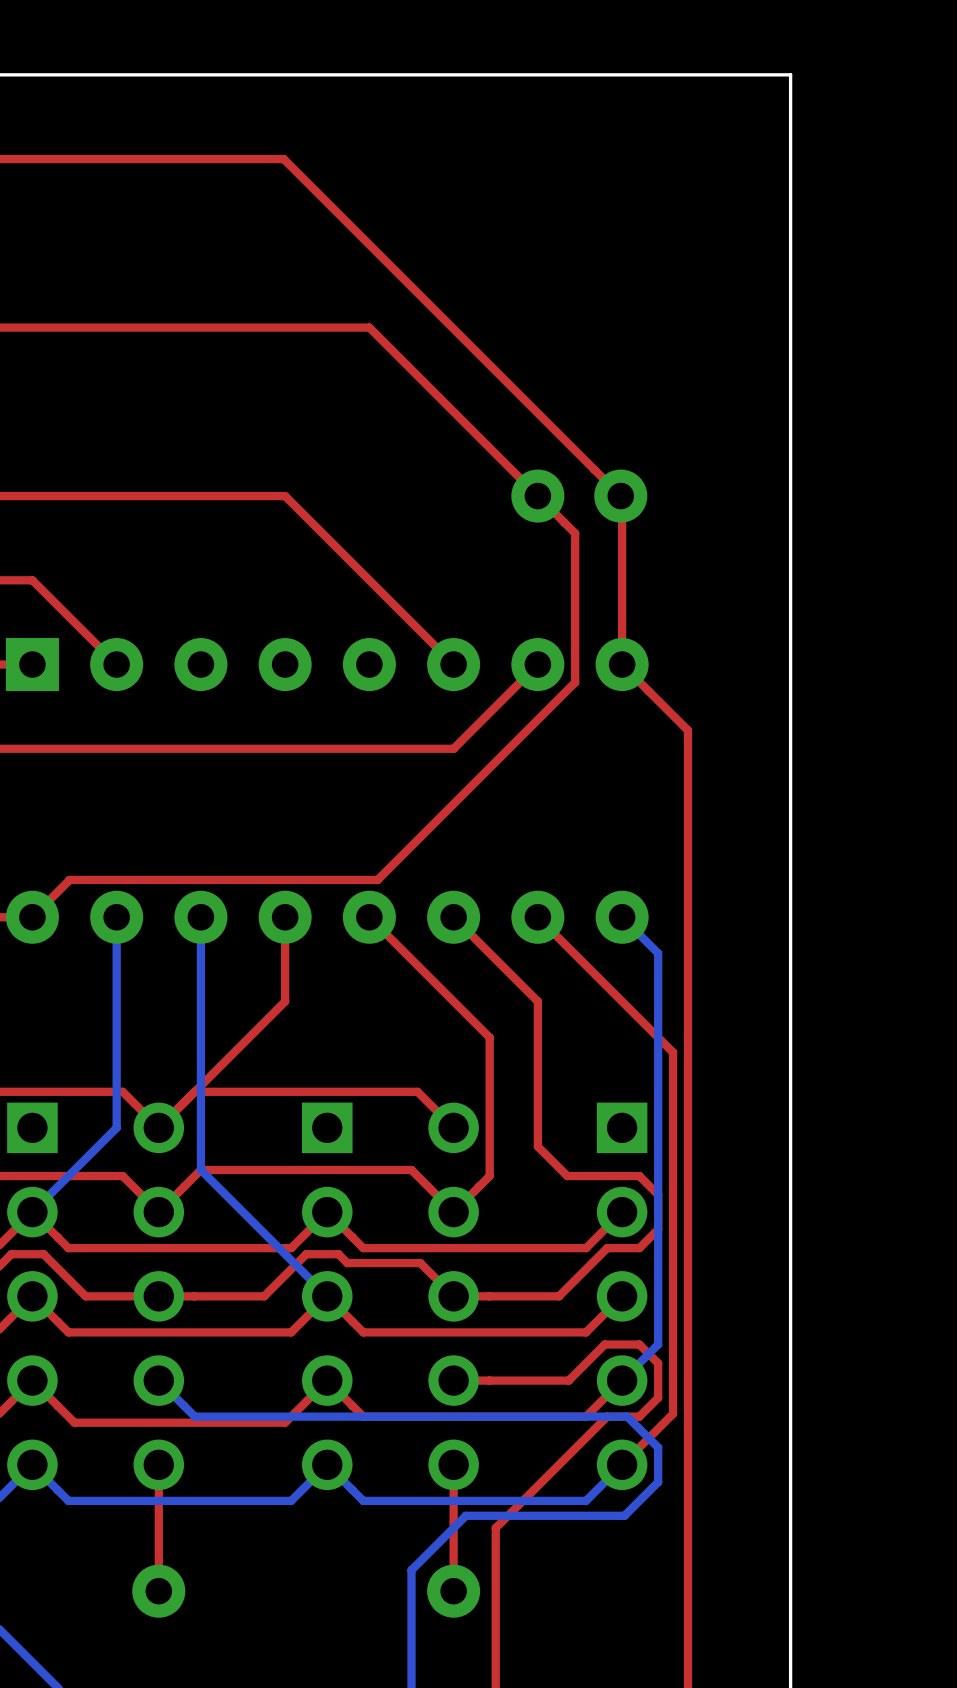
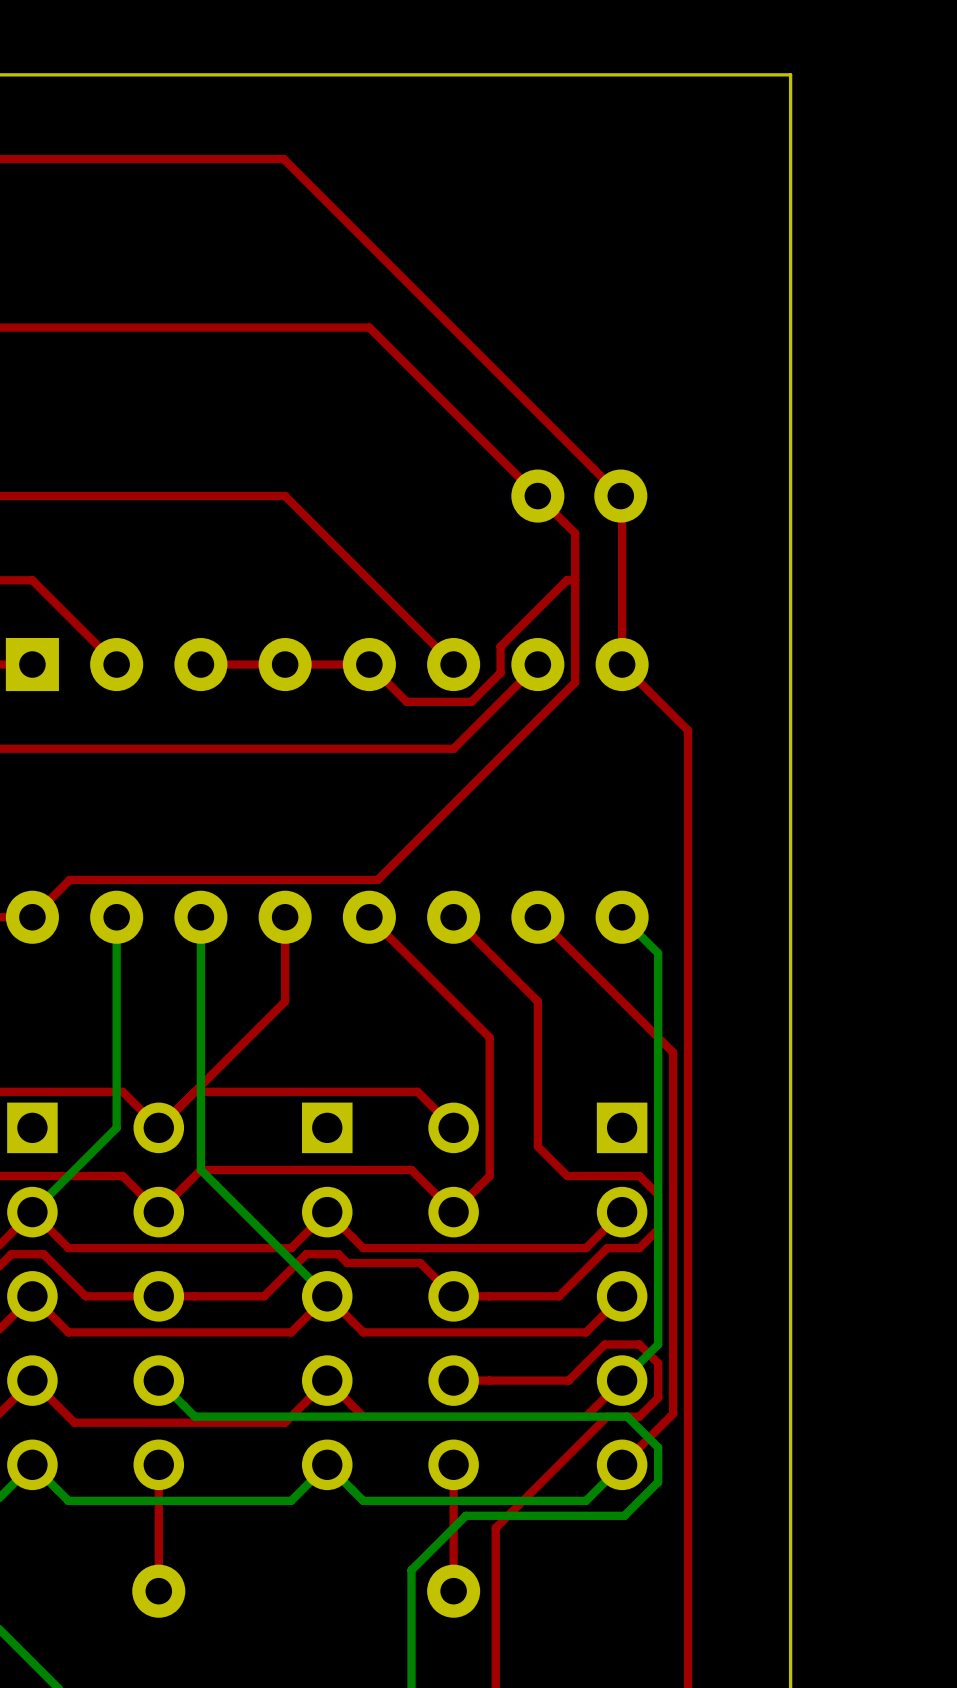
top track: none -> (575, 580) (566, 580) (500, 646) (500, 672) (471, 701) (406, 701) (369, 664) (200, 664)

